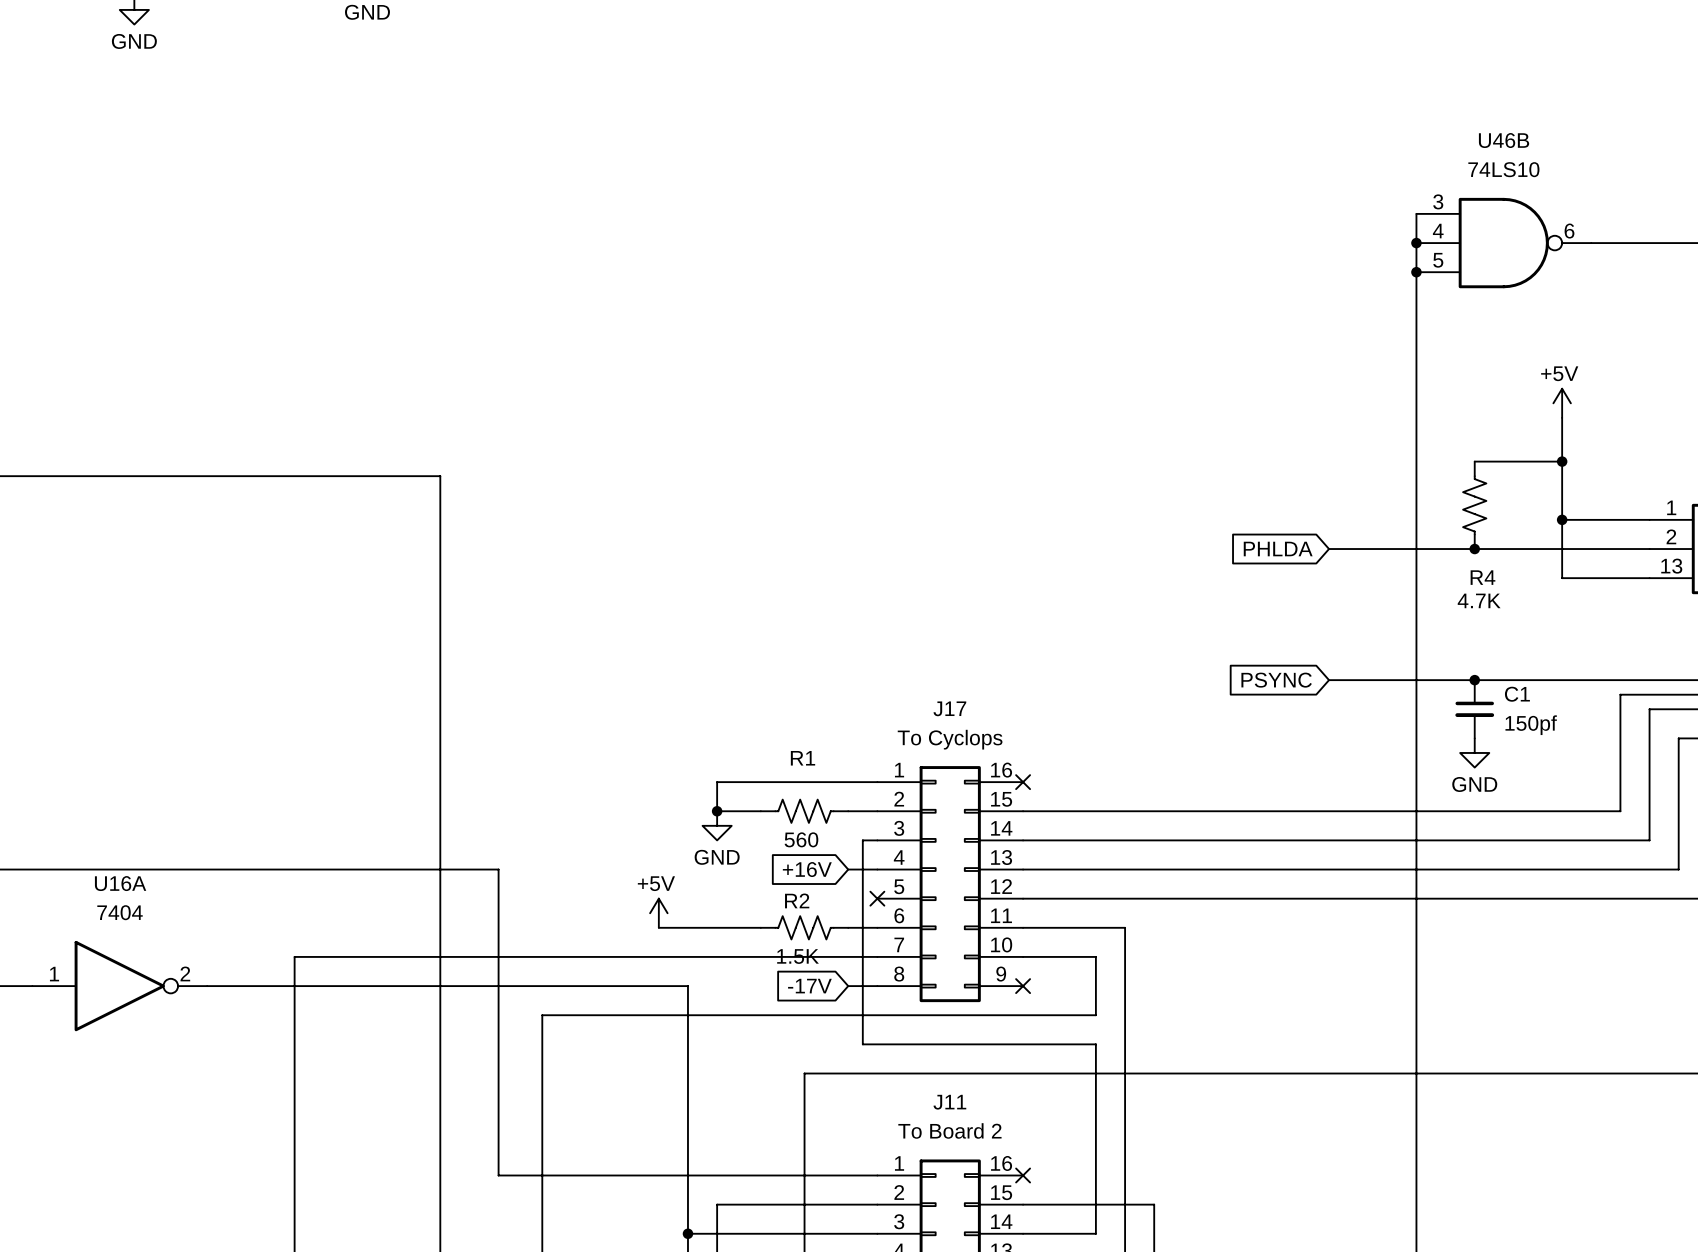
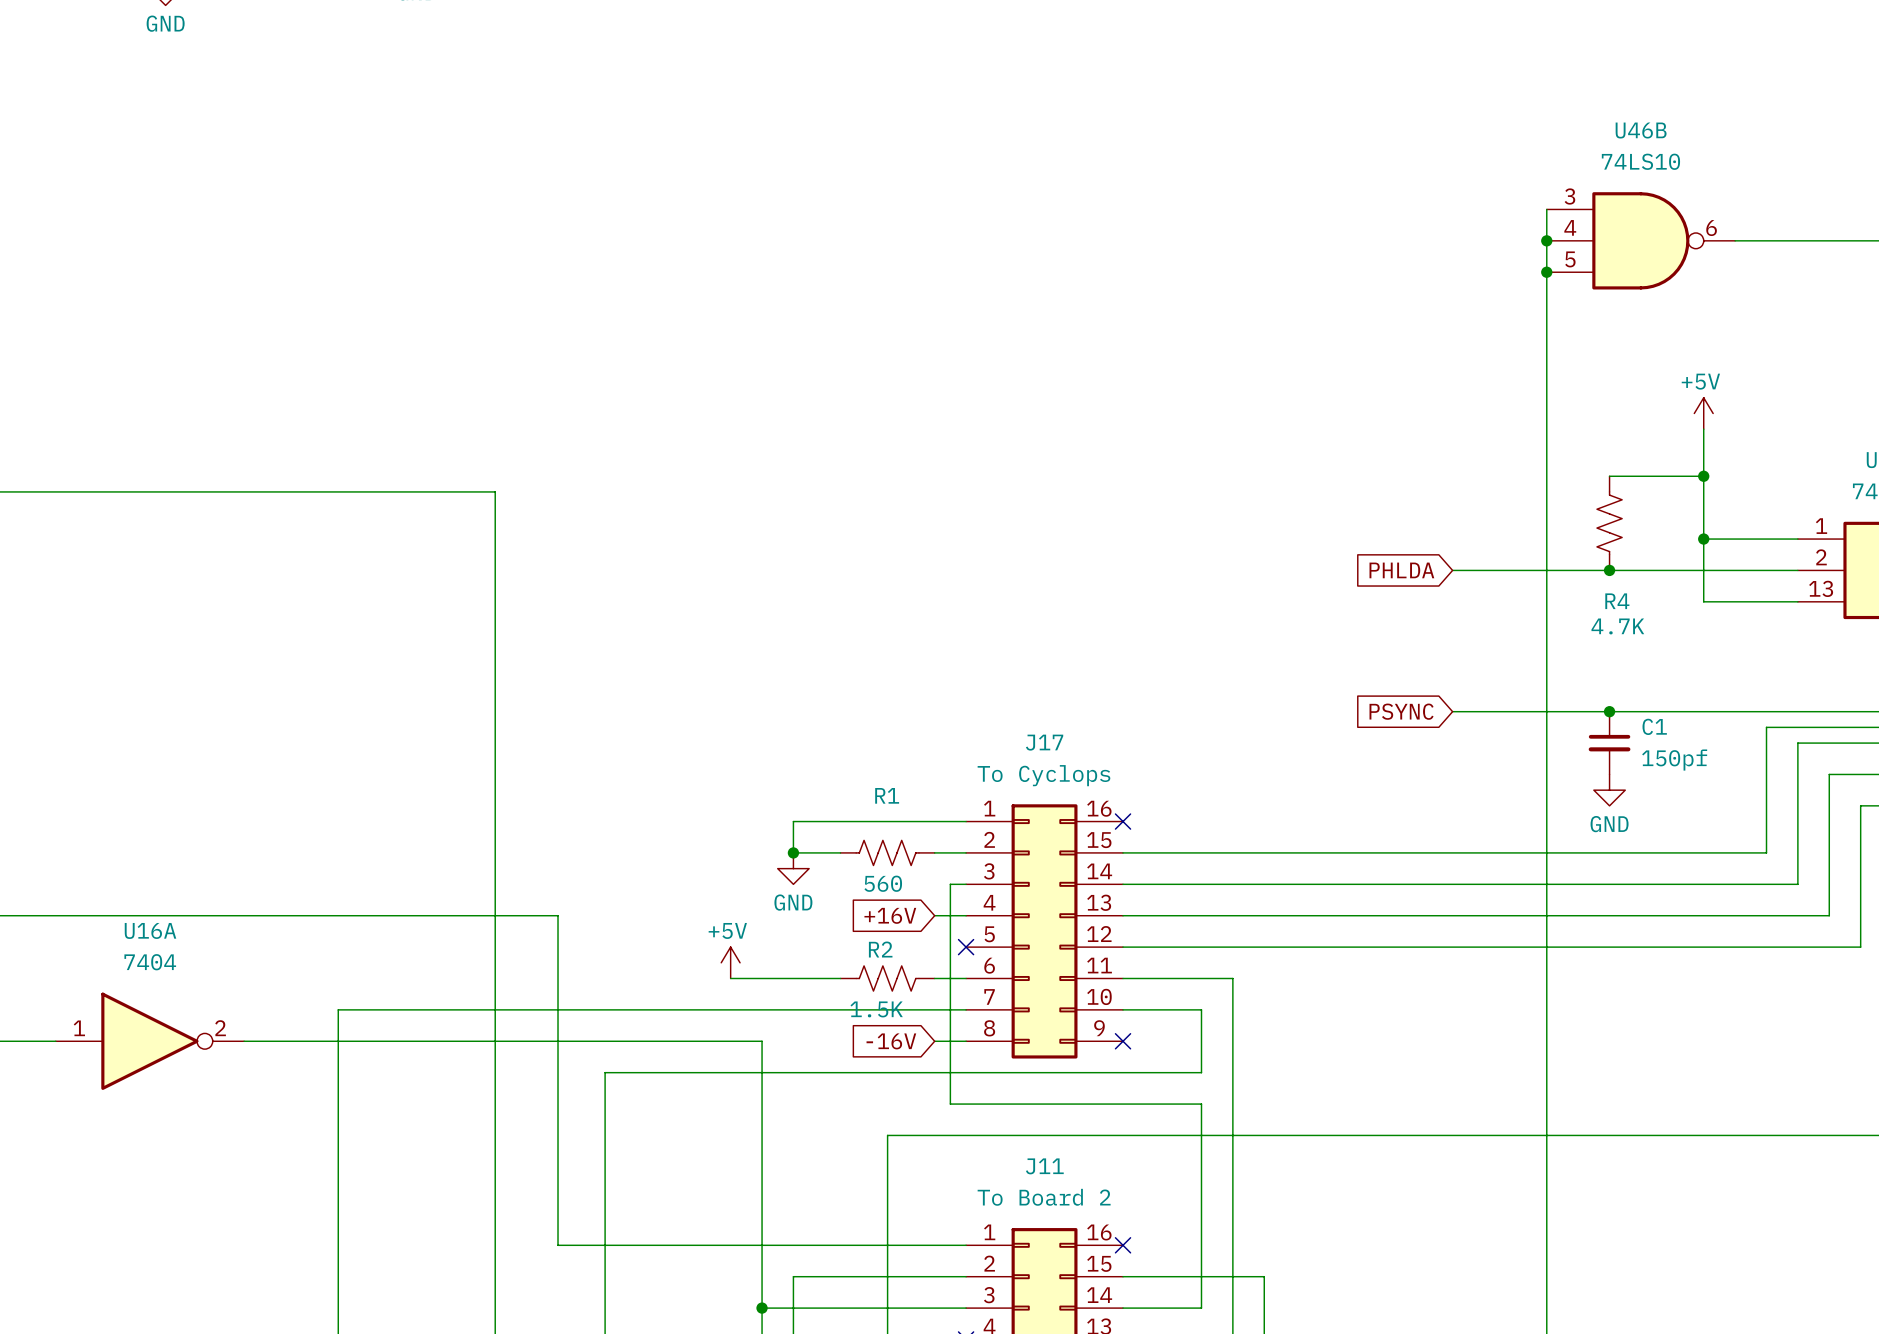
global label: -17V (809, 986) -> -16V (891, 1041)

